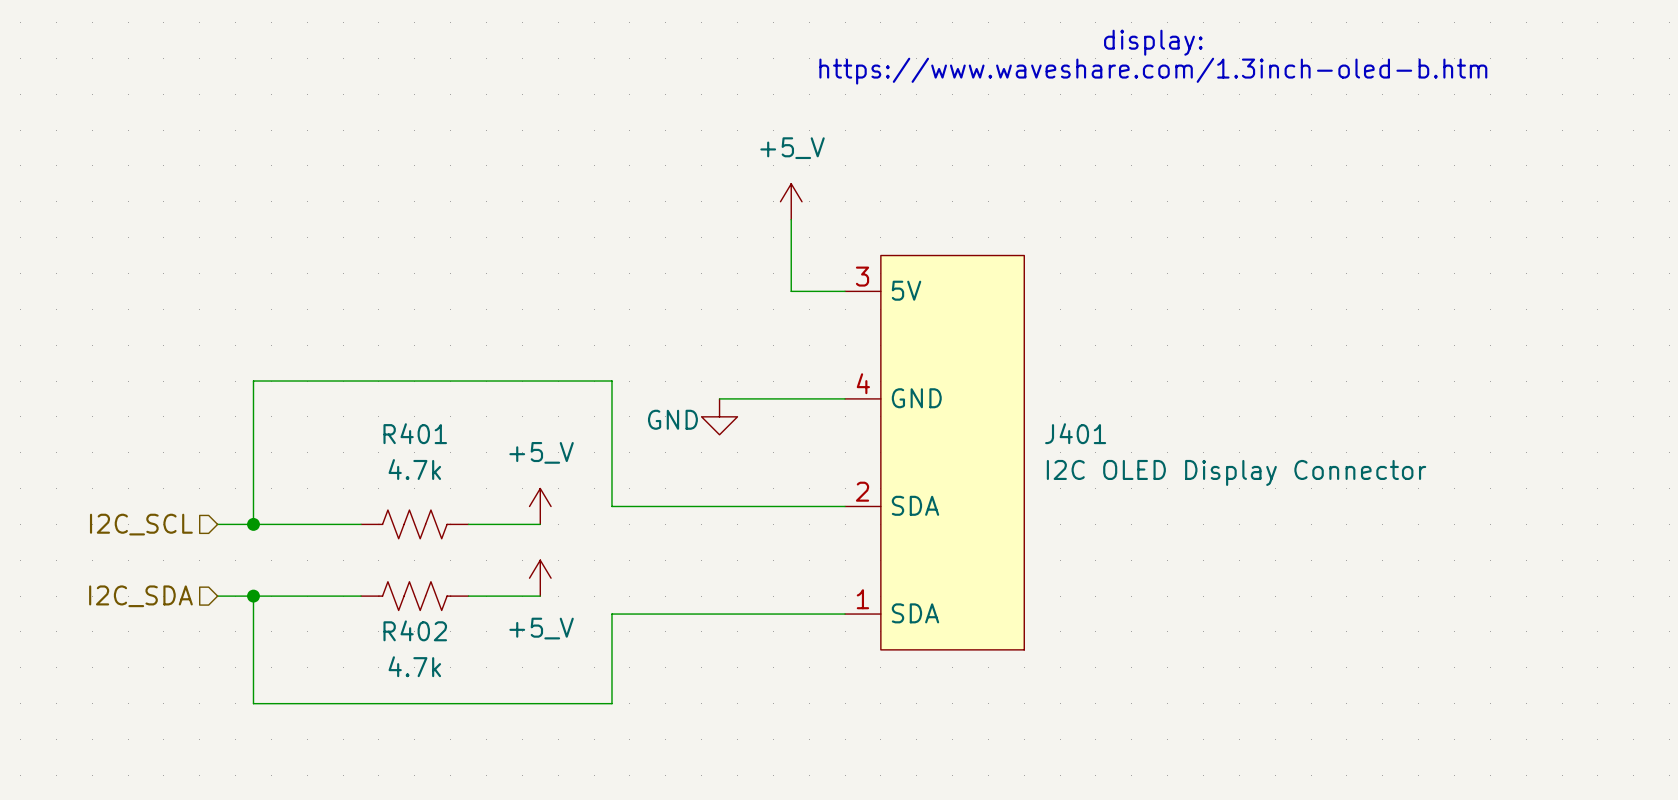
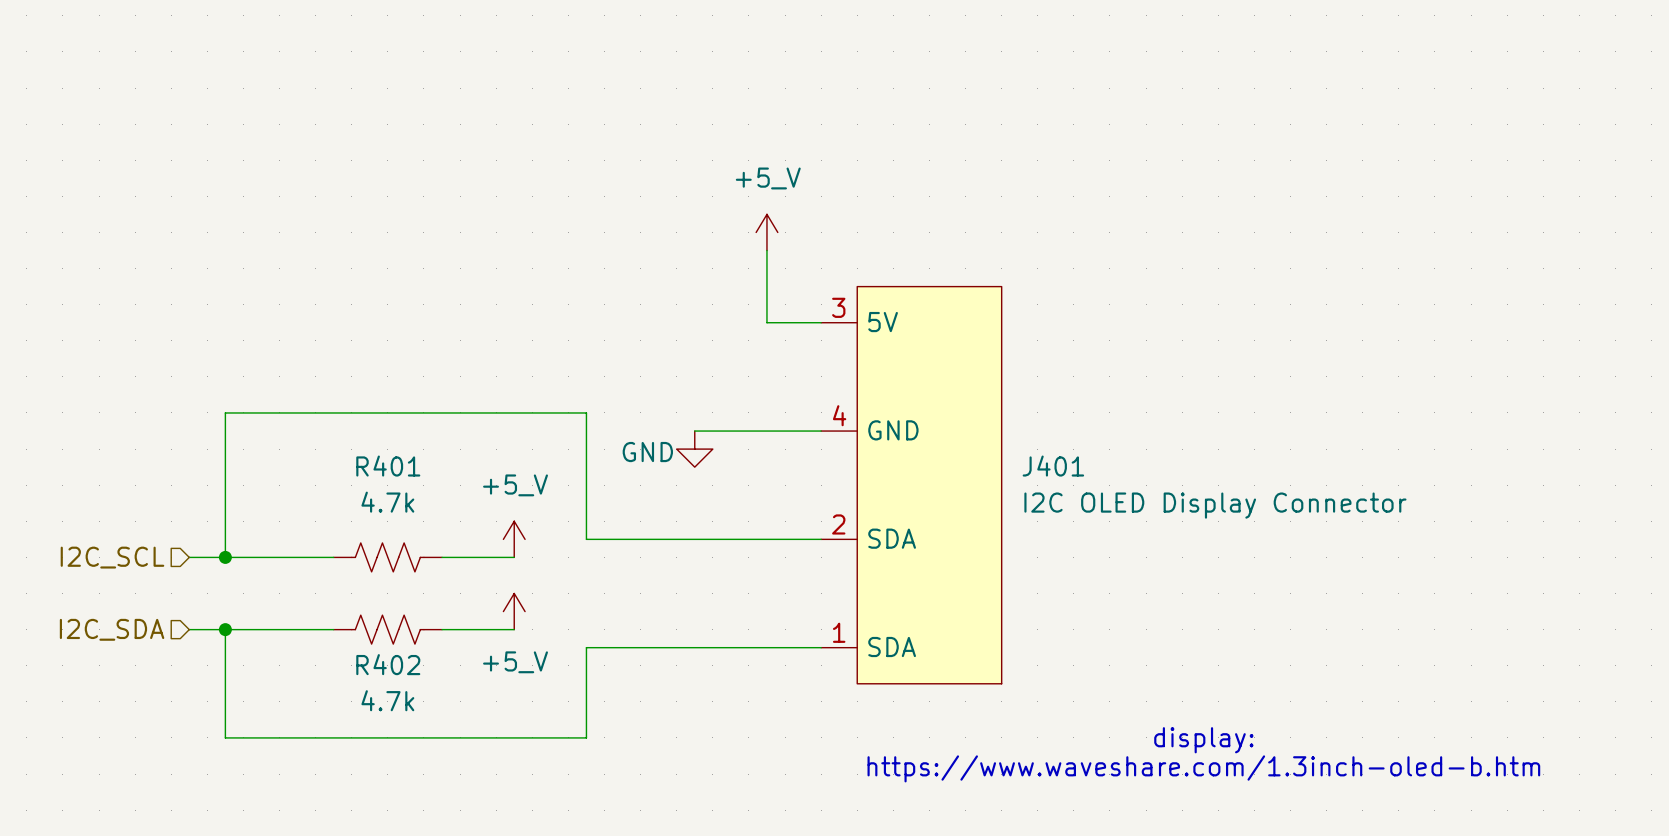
text: display: (1153, 42) -> none
text: https://www.waveshare.com/1.3inch-oled-b.htm (1153, 71) -> none
text: none -> display: (1203, 740)
text: none -> https://www.waveshare.com/1.3inch-oled-b.htm (1203, 768)

